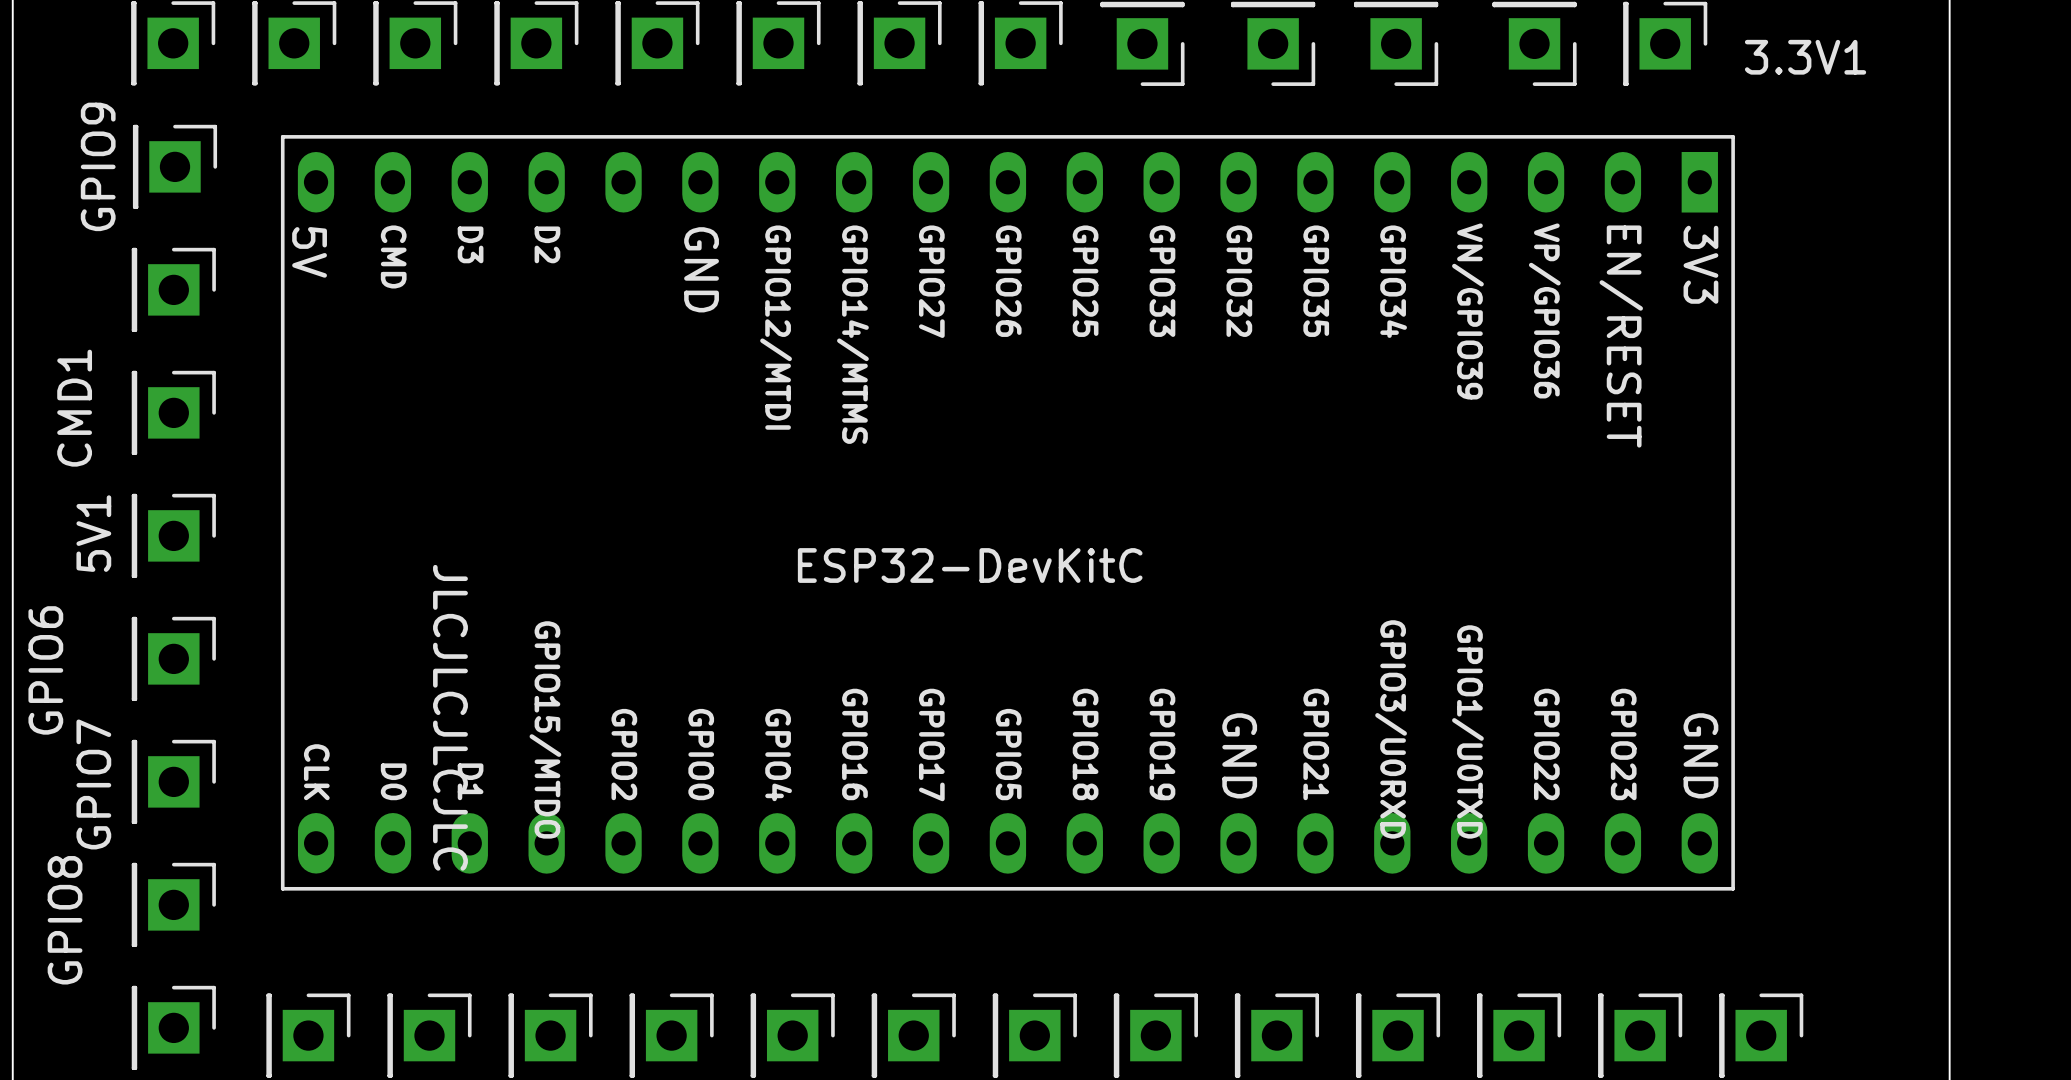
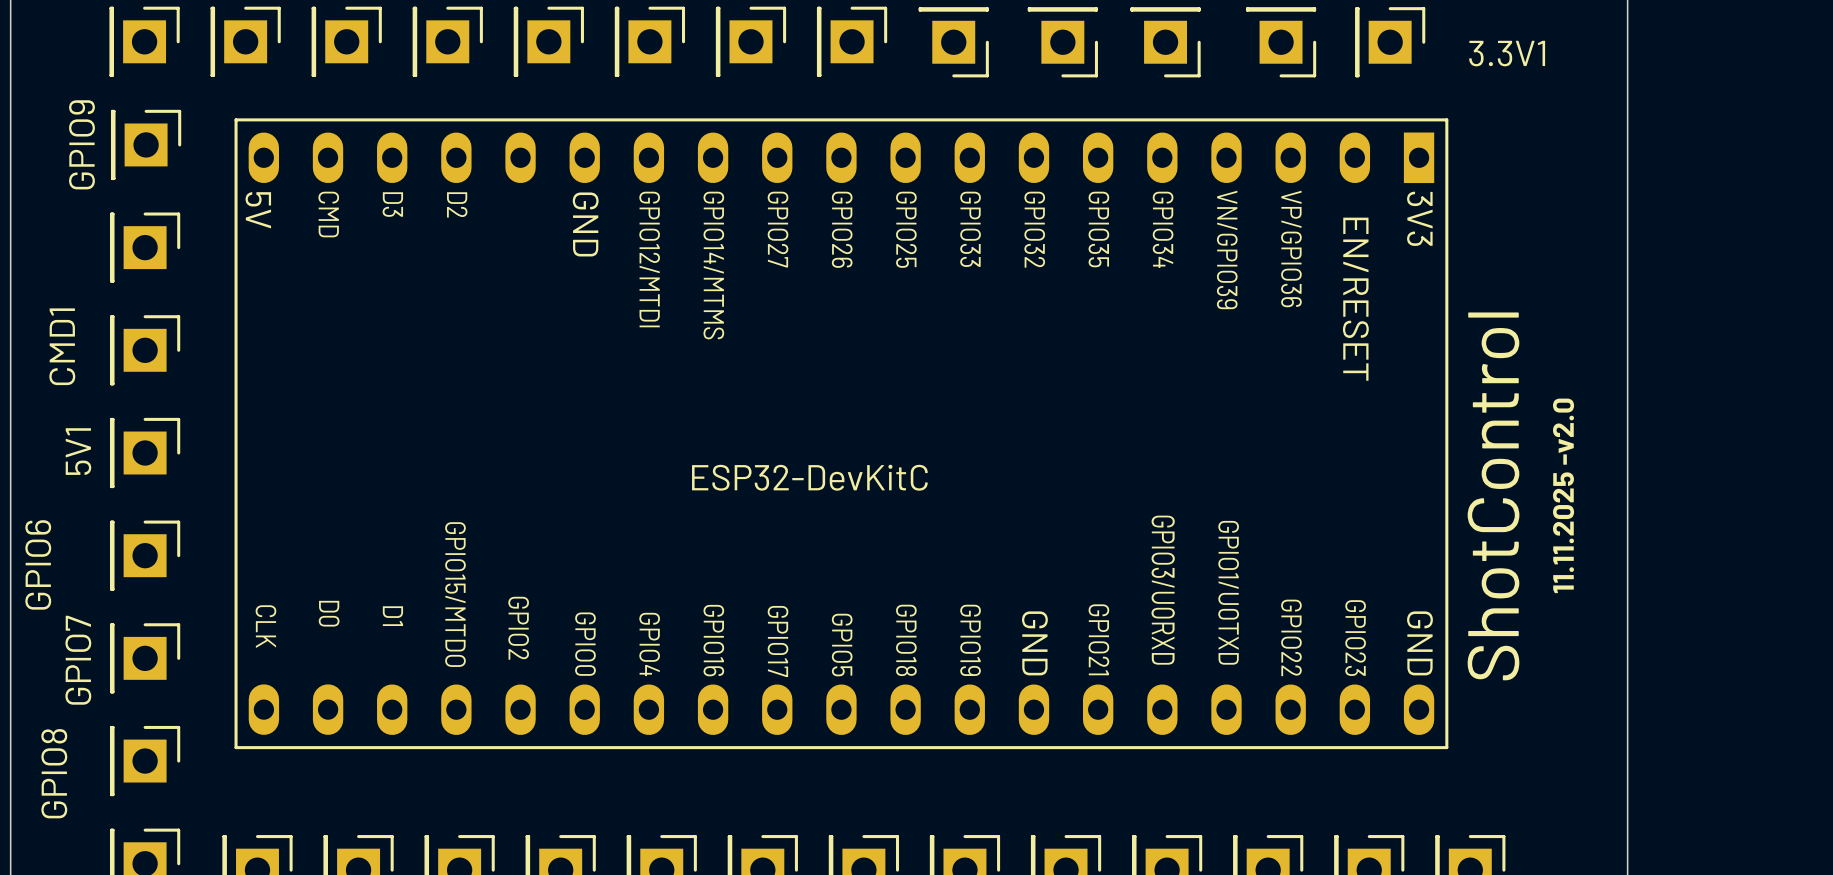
part footprint: [280, 135, 1735, 891] -> [234, 118, 1449, 750]
text: none -> 11.11.2025 -v2.0 (1563, 495)
text: none -> ShotControl (1493, 496)
text: JLCJLCJLCJLC (450, 717) -> none

